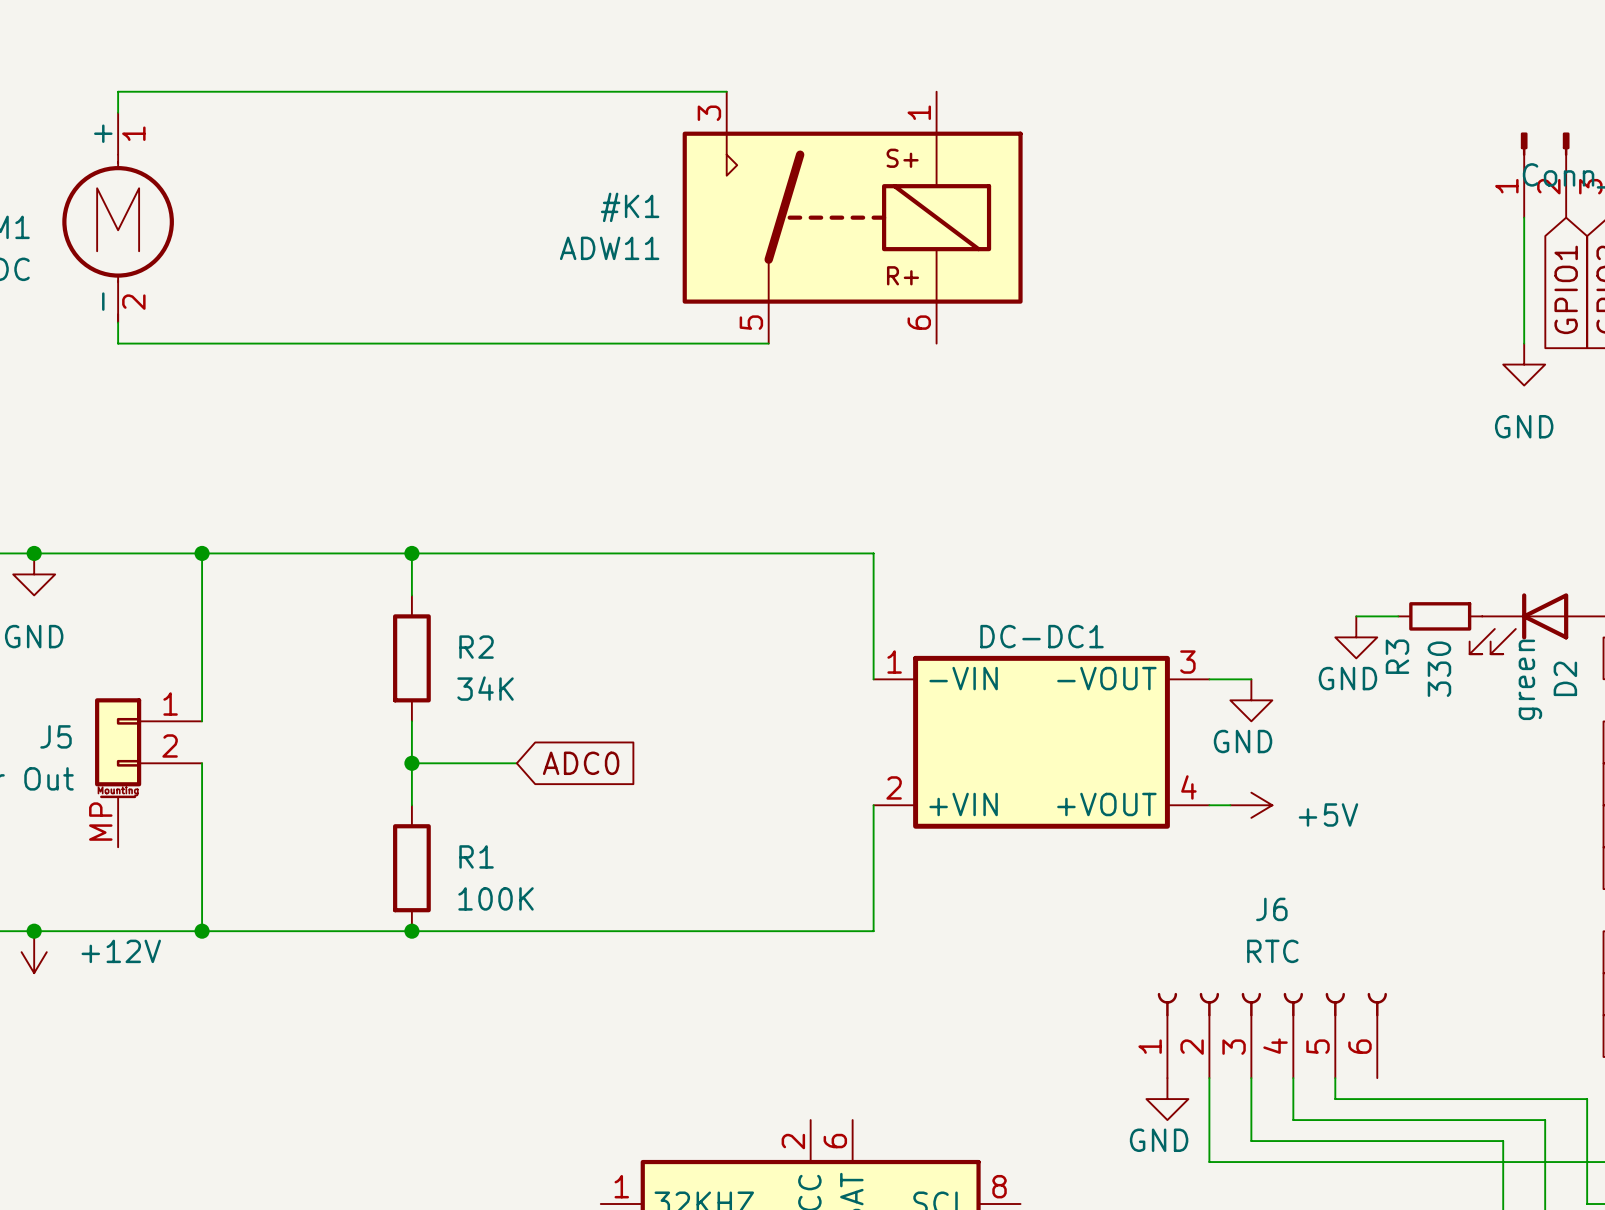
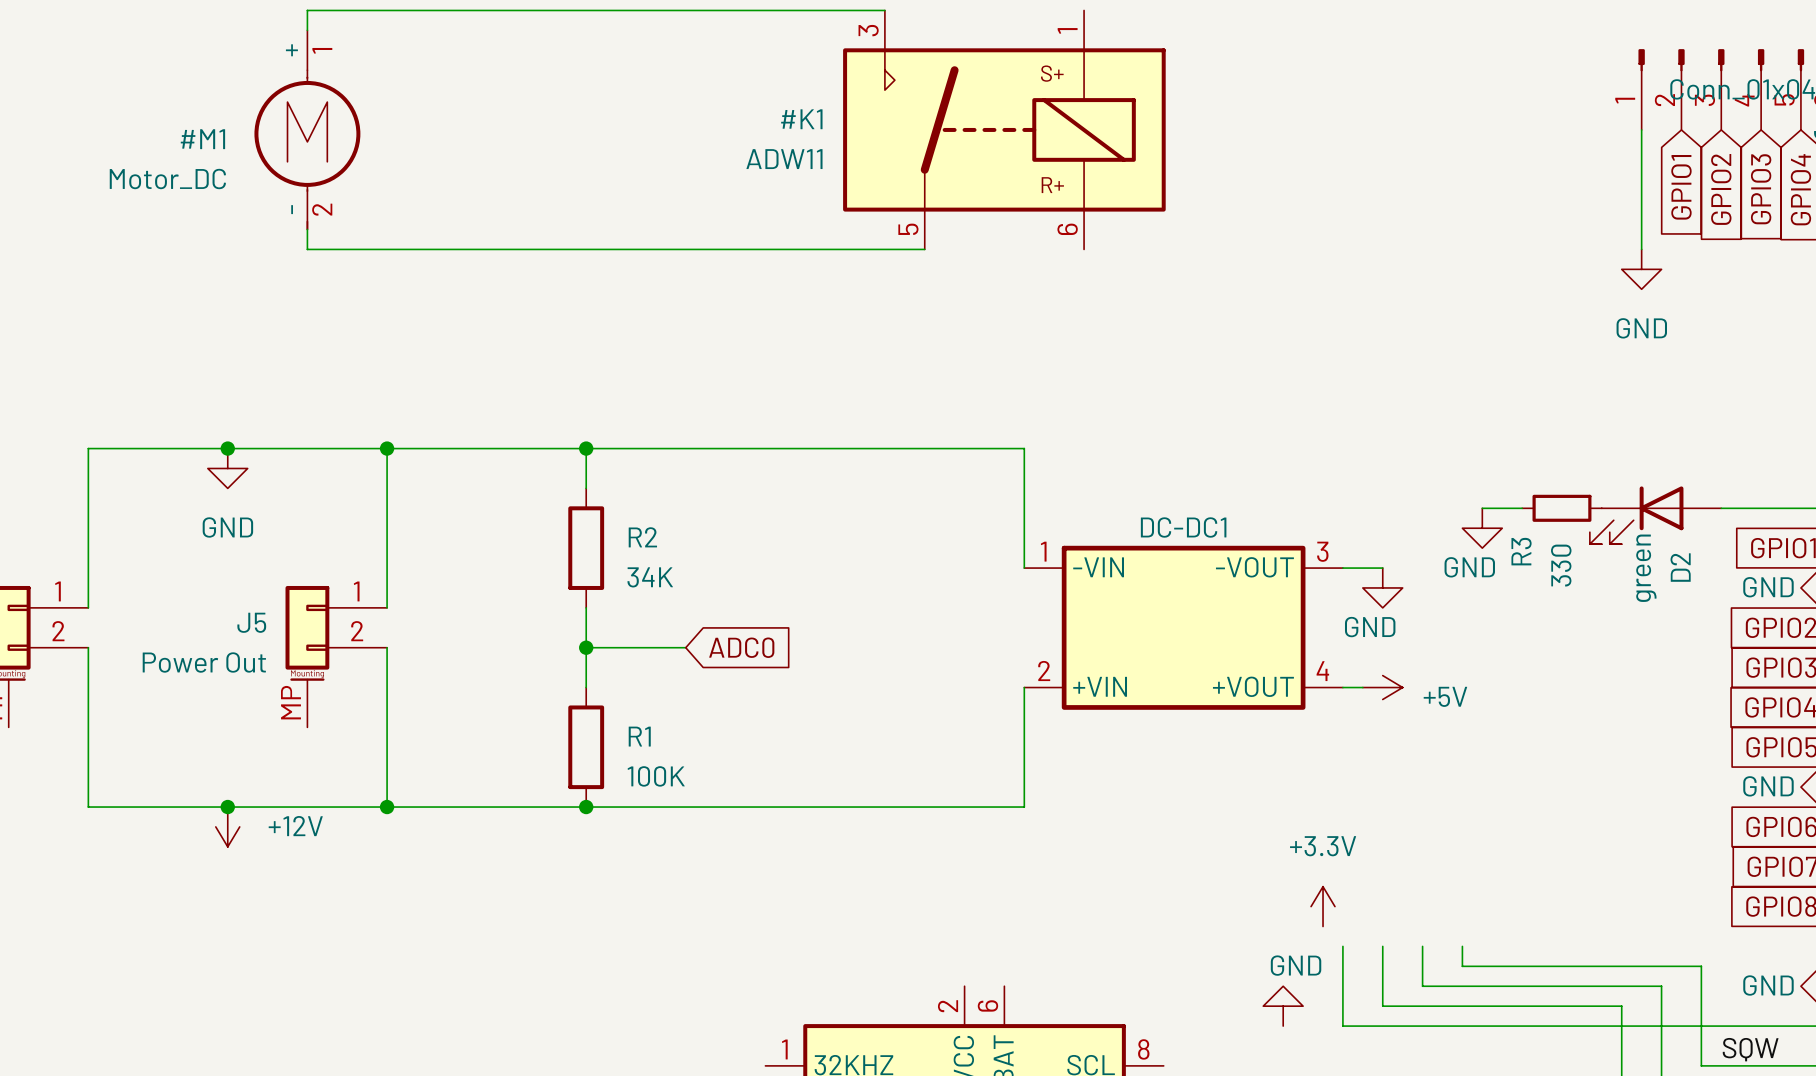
J6: RTC (1272, 1035) -> none
power symbol: none -> +3.3V (1323, 906)
power symbol rotation: 0° (1167, 1099) -> 180° (1283, 1006)
power symbol position: GND (1167, 1099) -> GND (1283, 1006)

